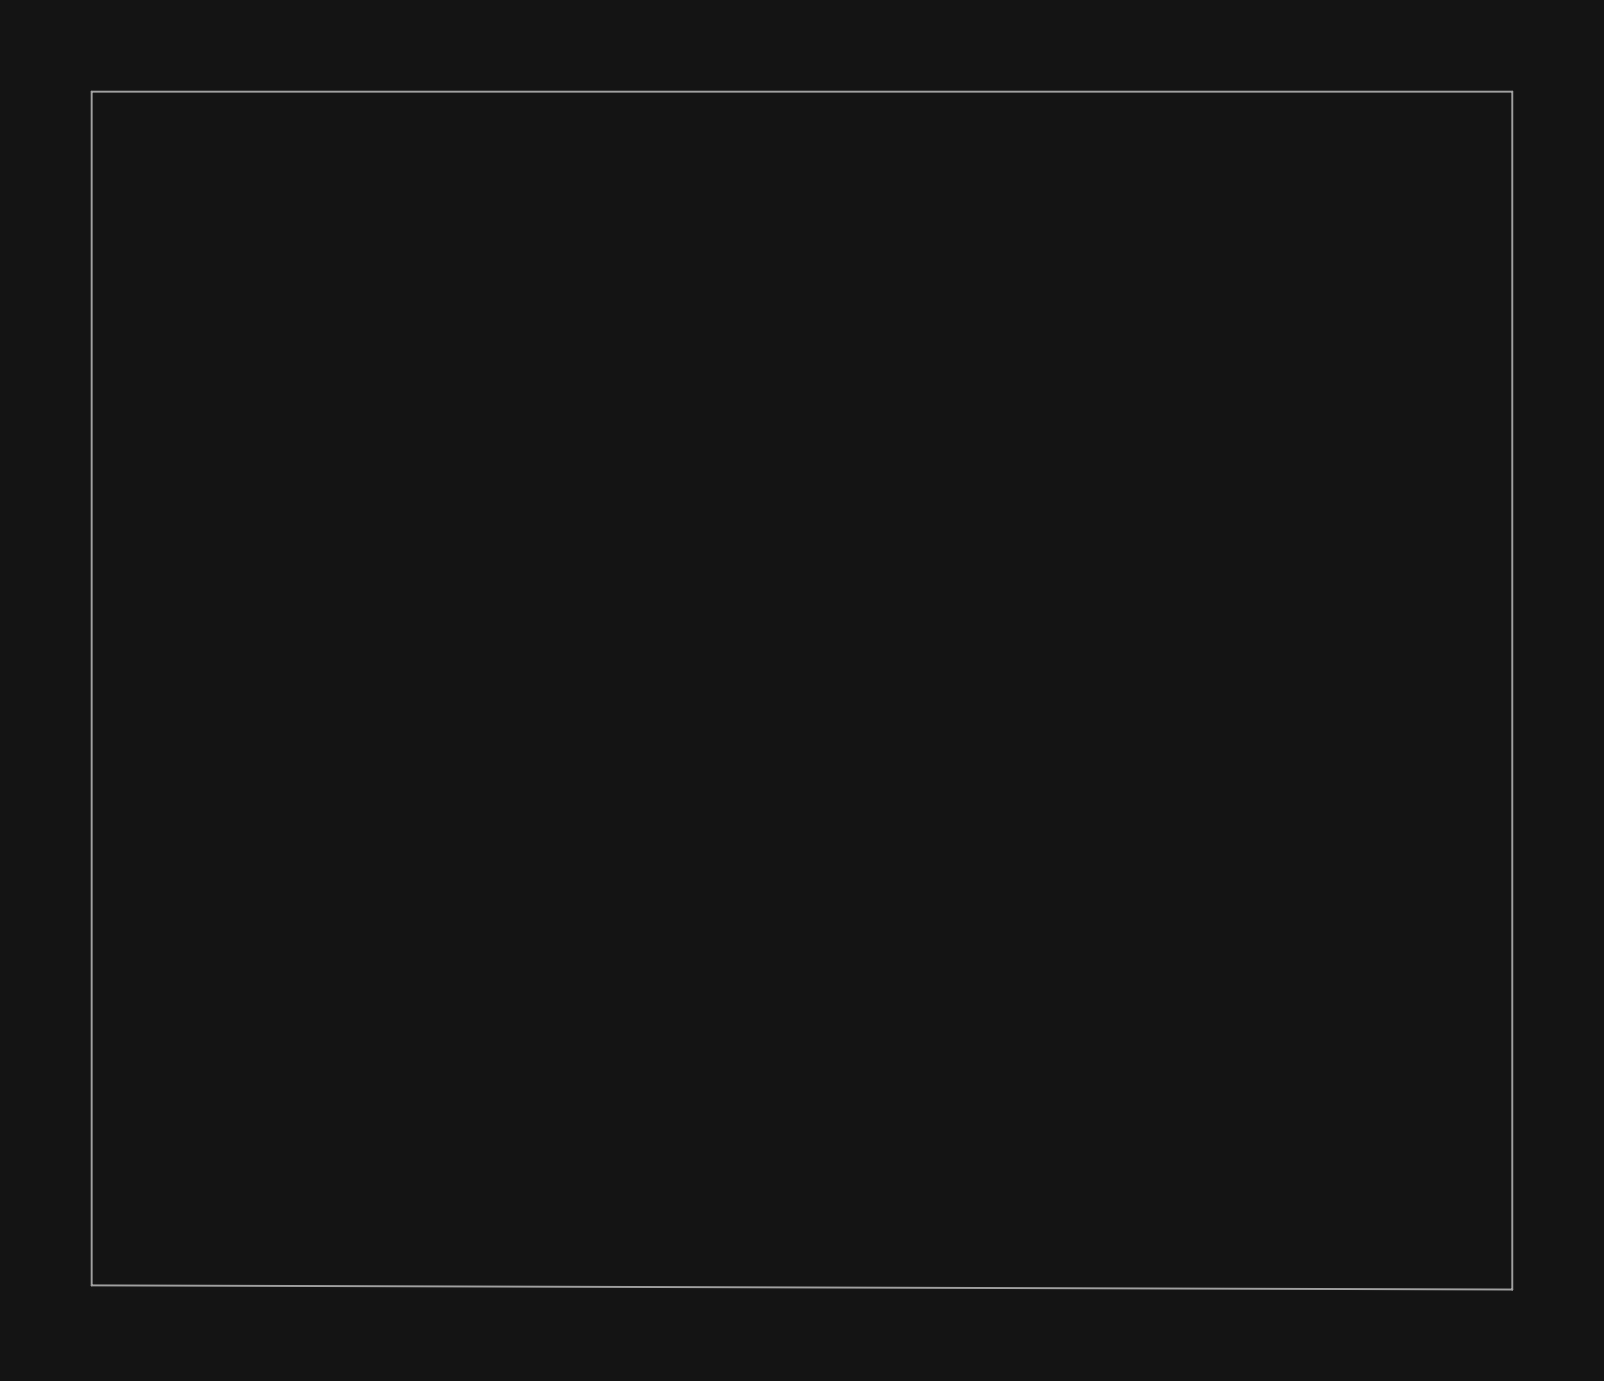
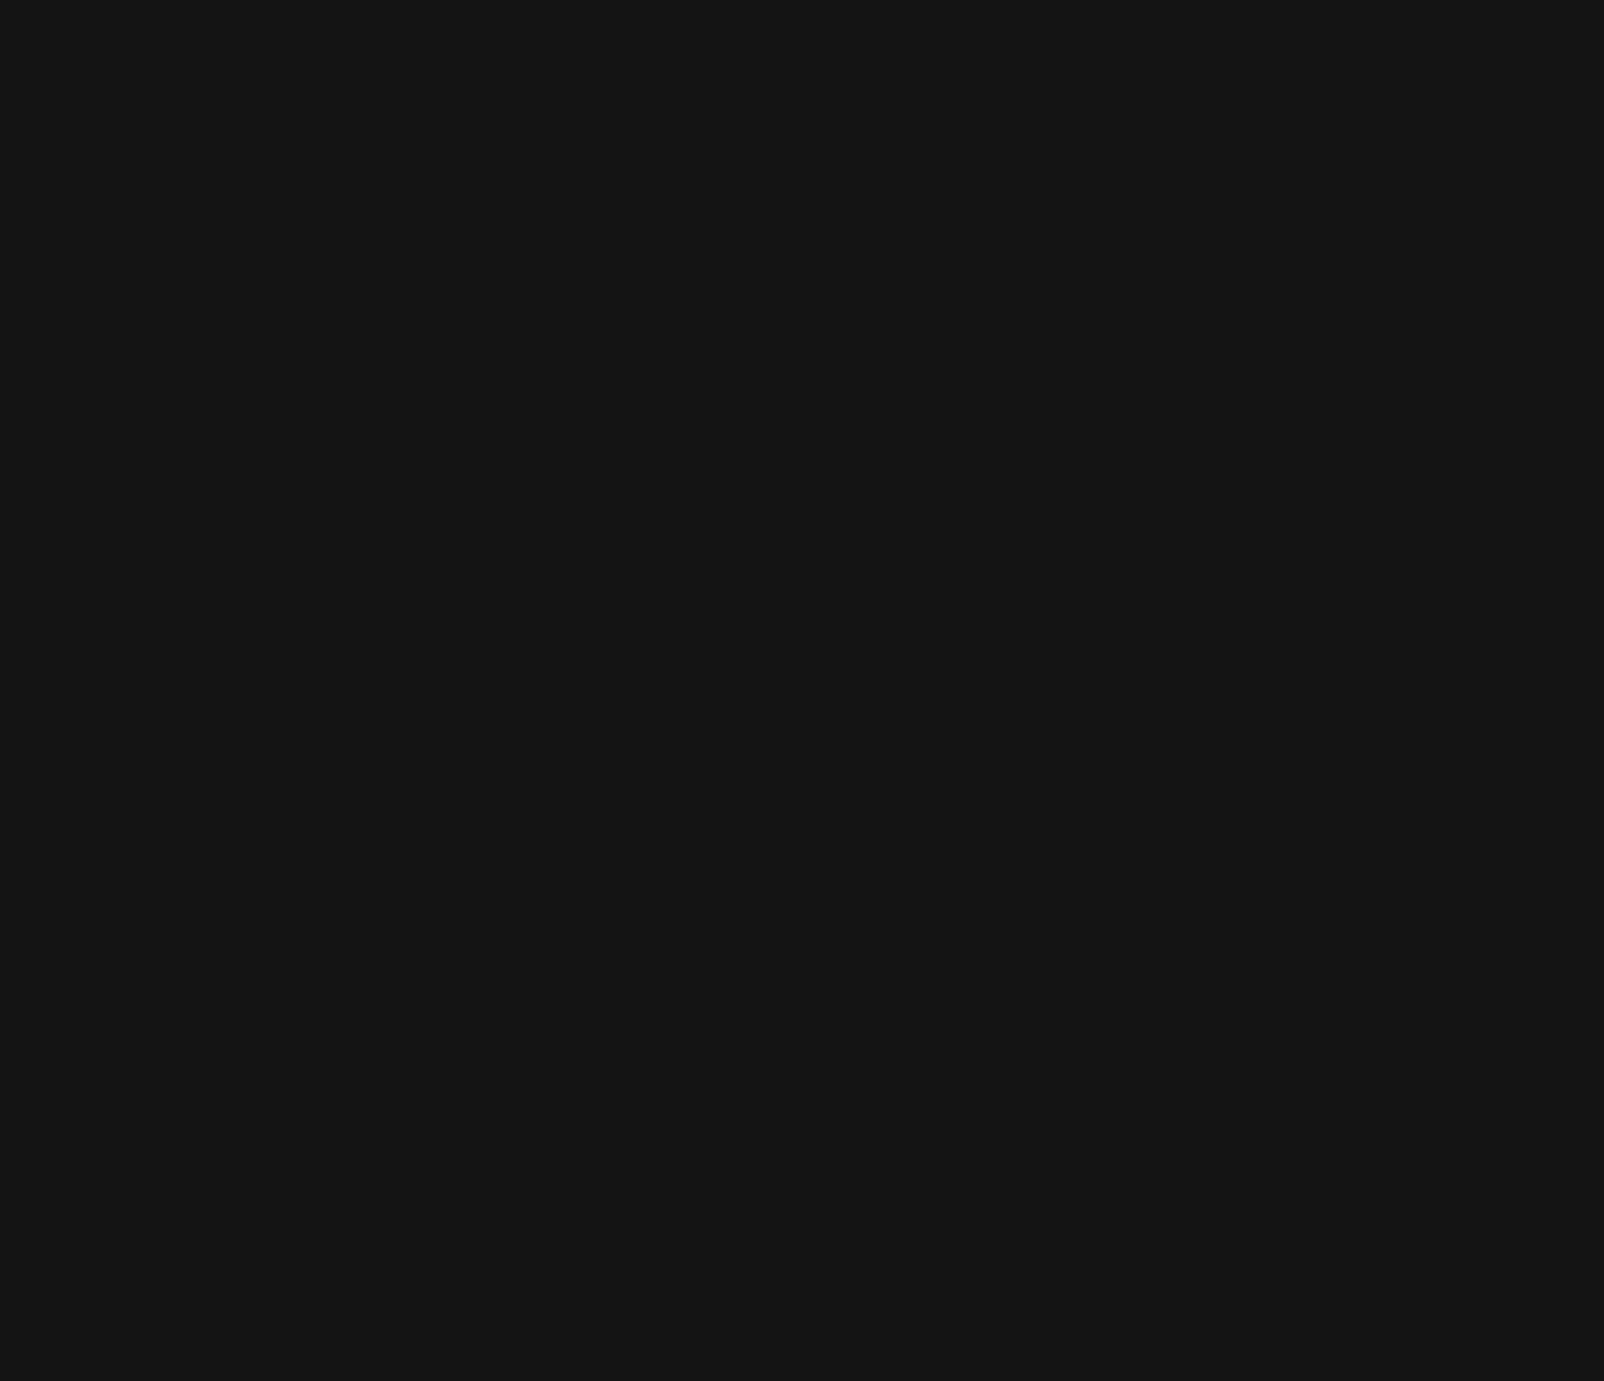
board edge: (1512, 91) (91, 91) (91, 1285) (1512, 1289) (1512, 91) -> none

